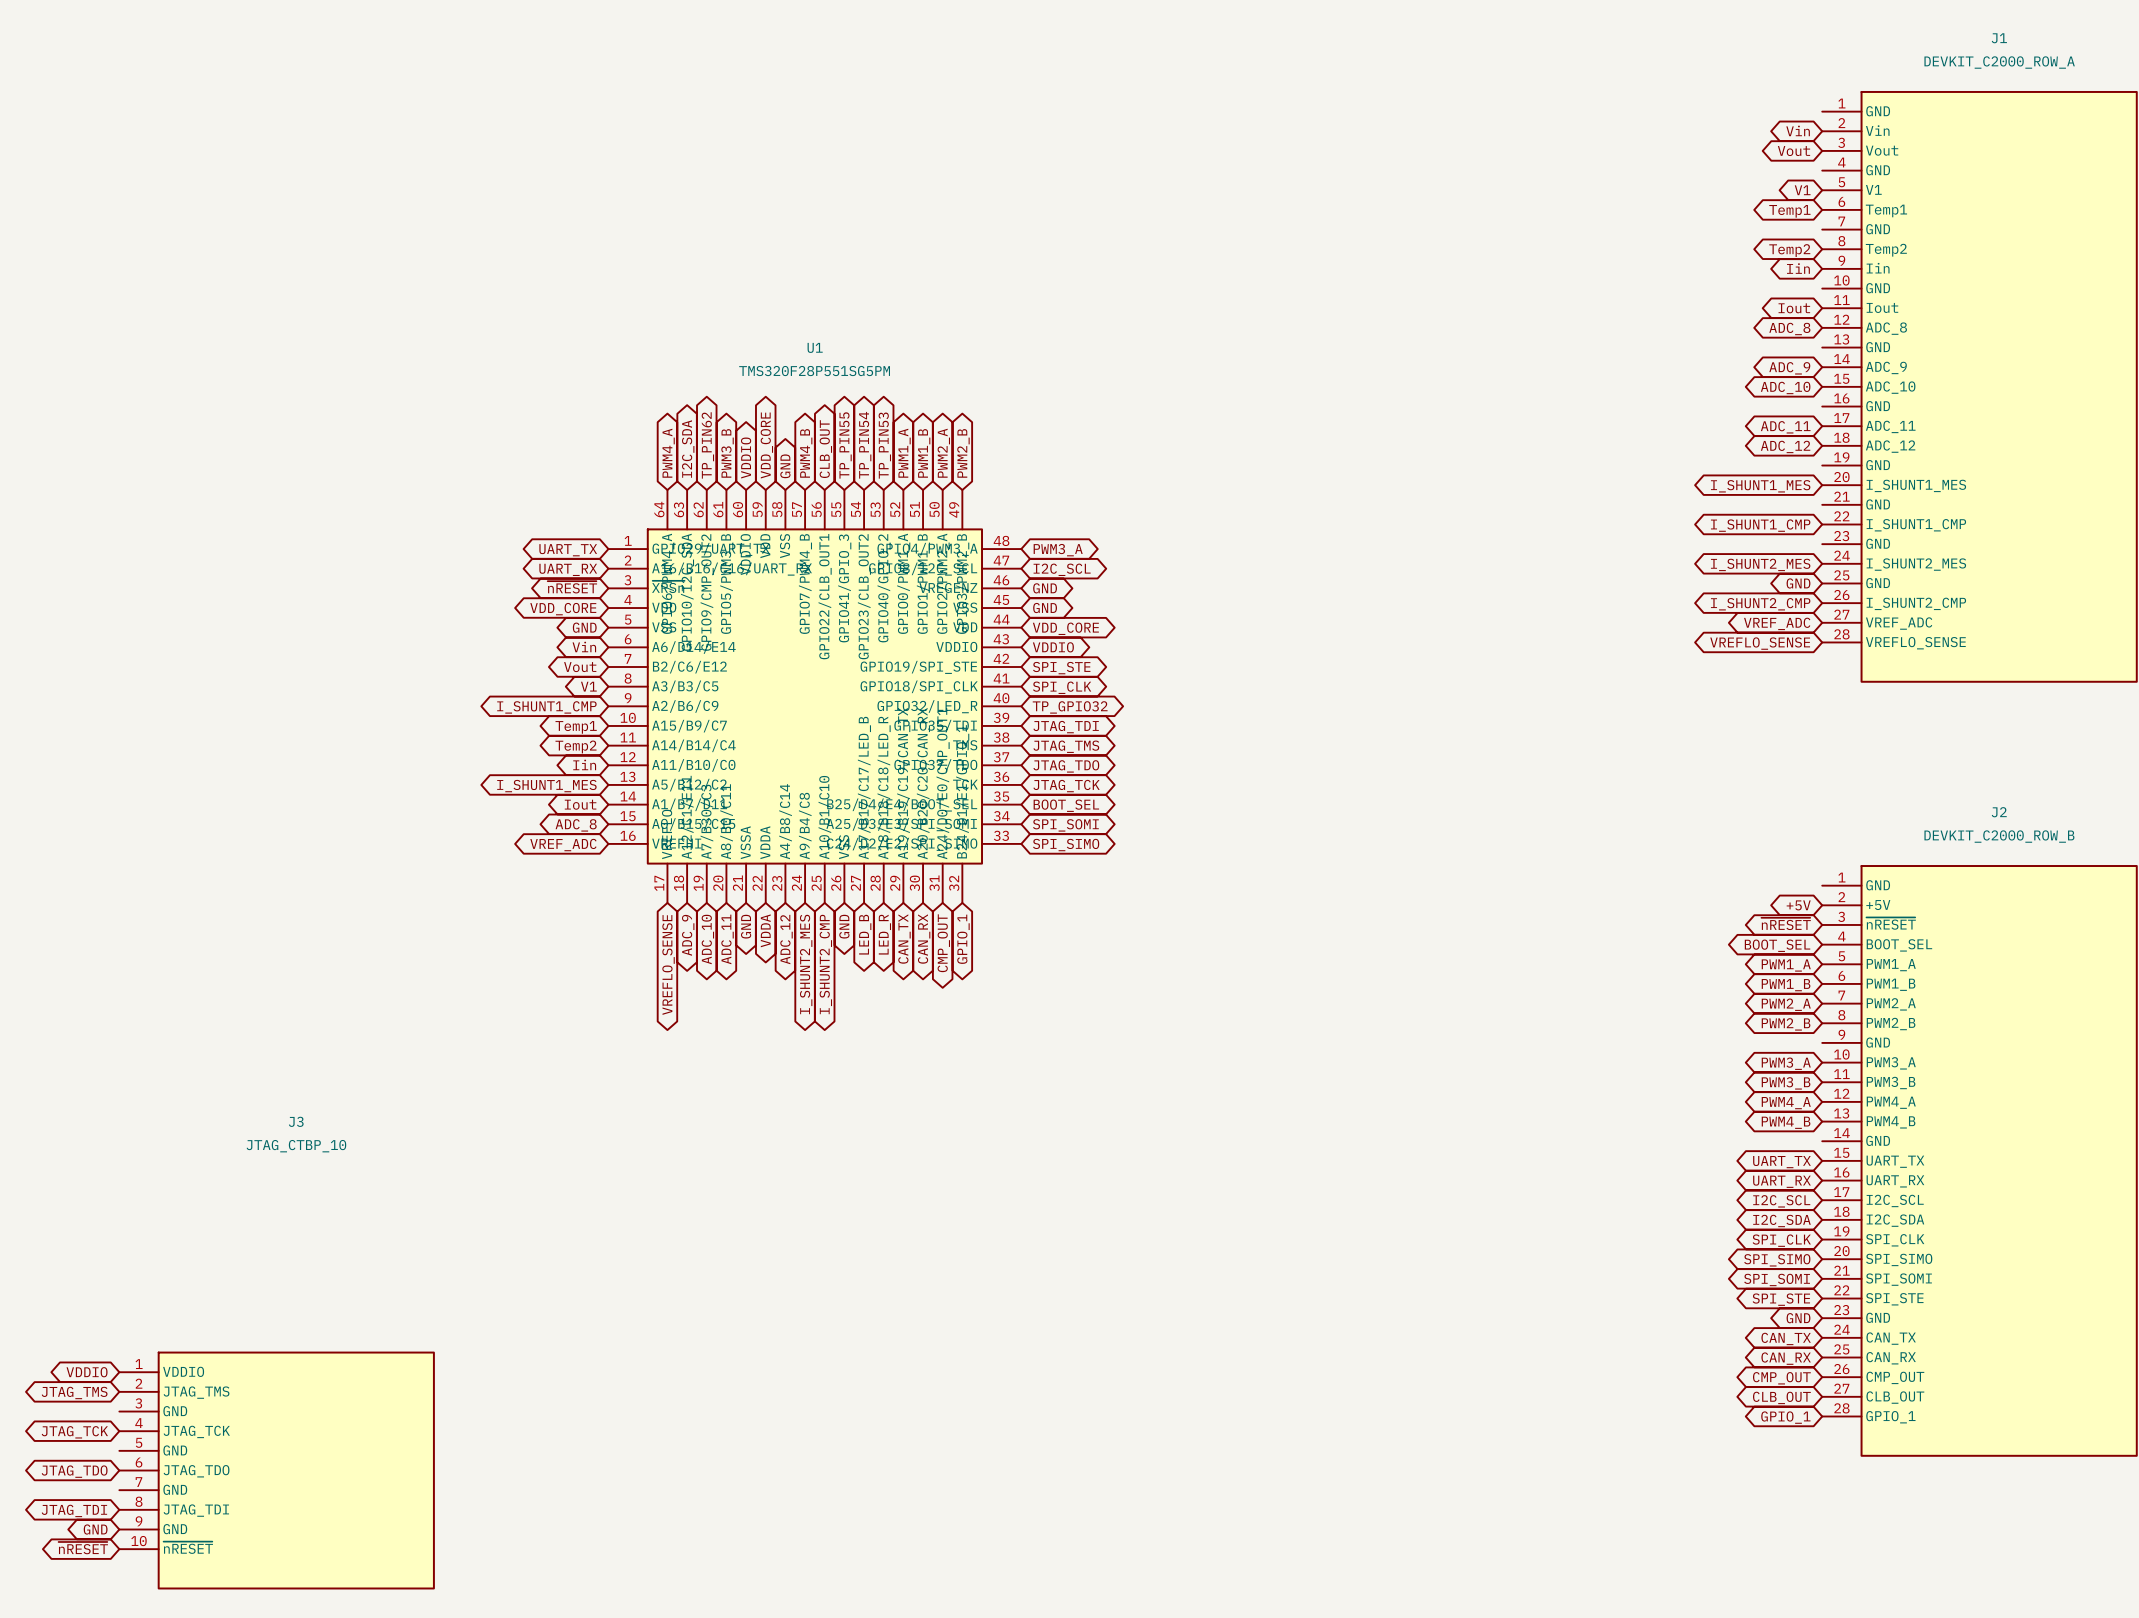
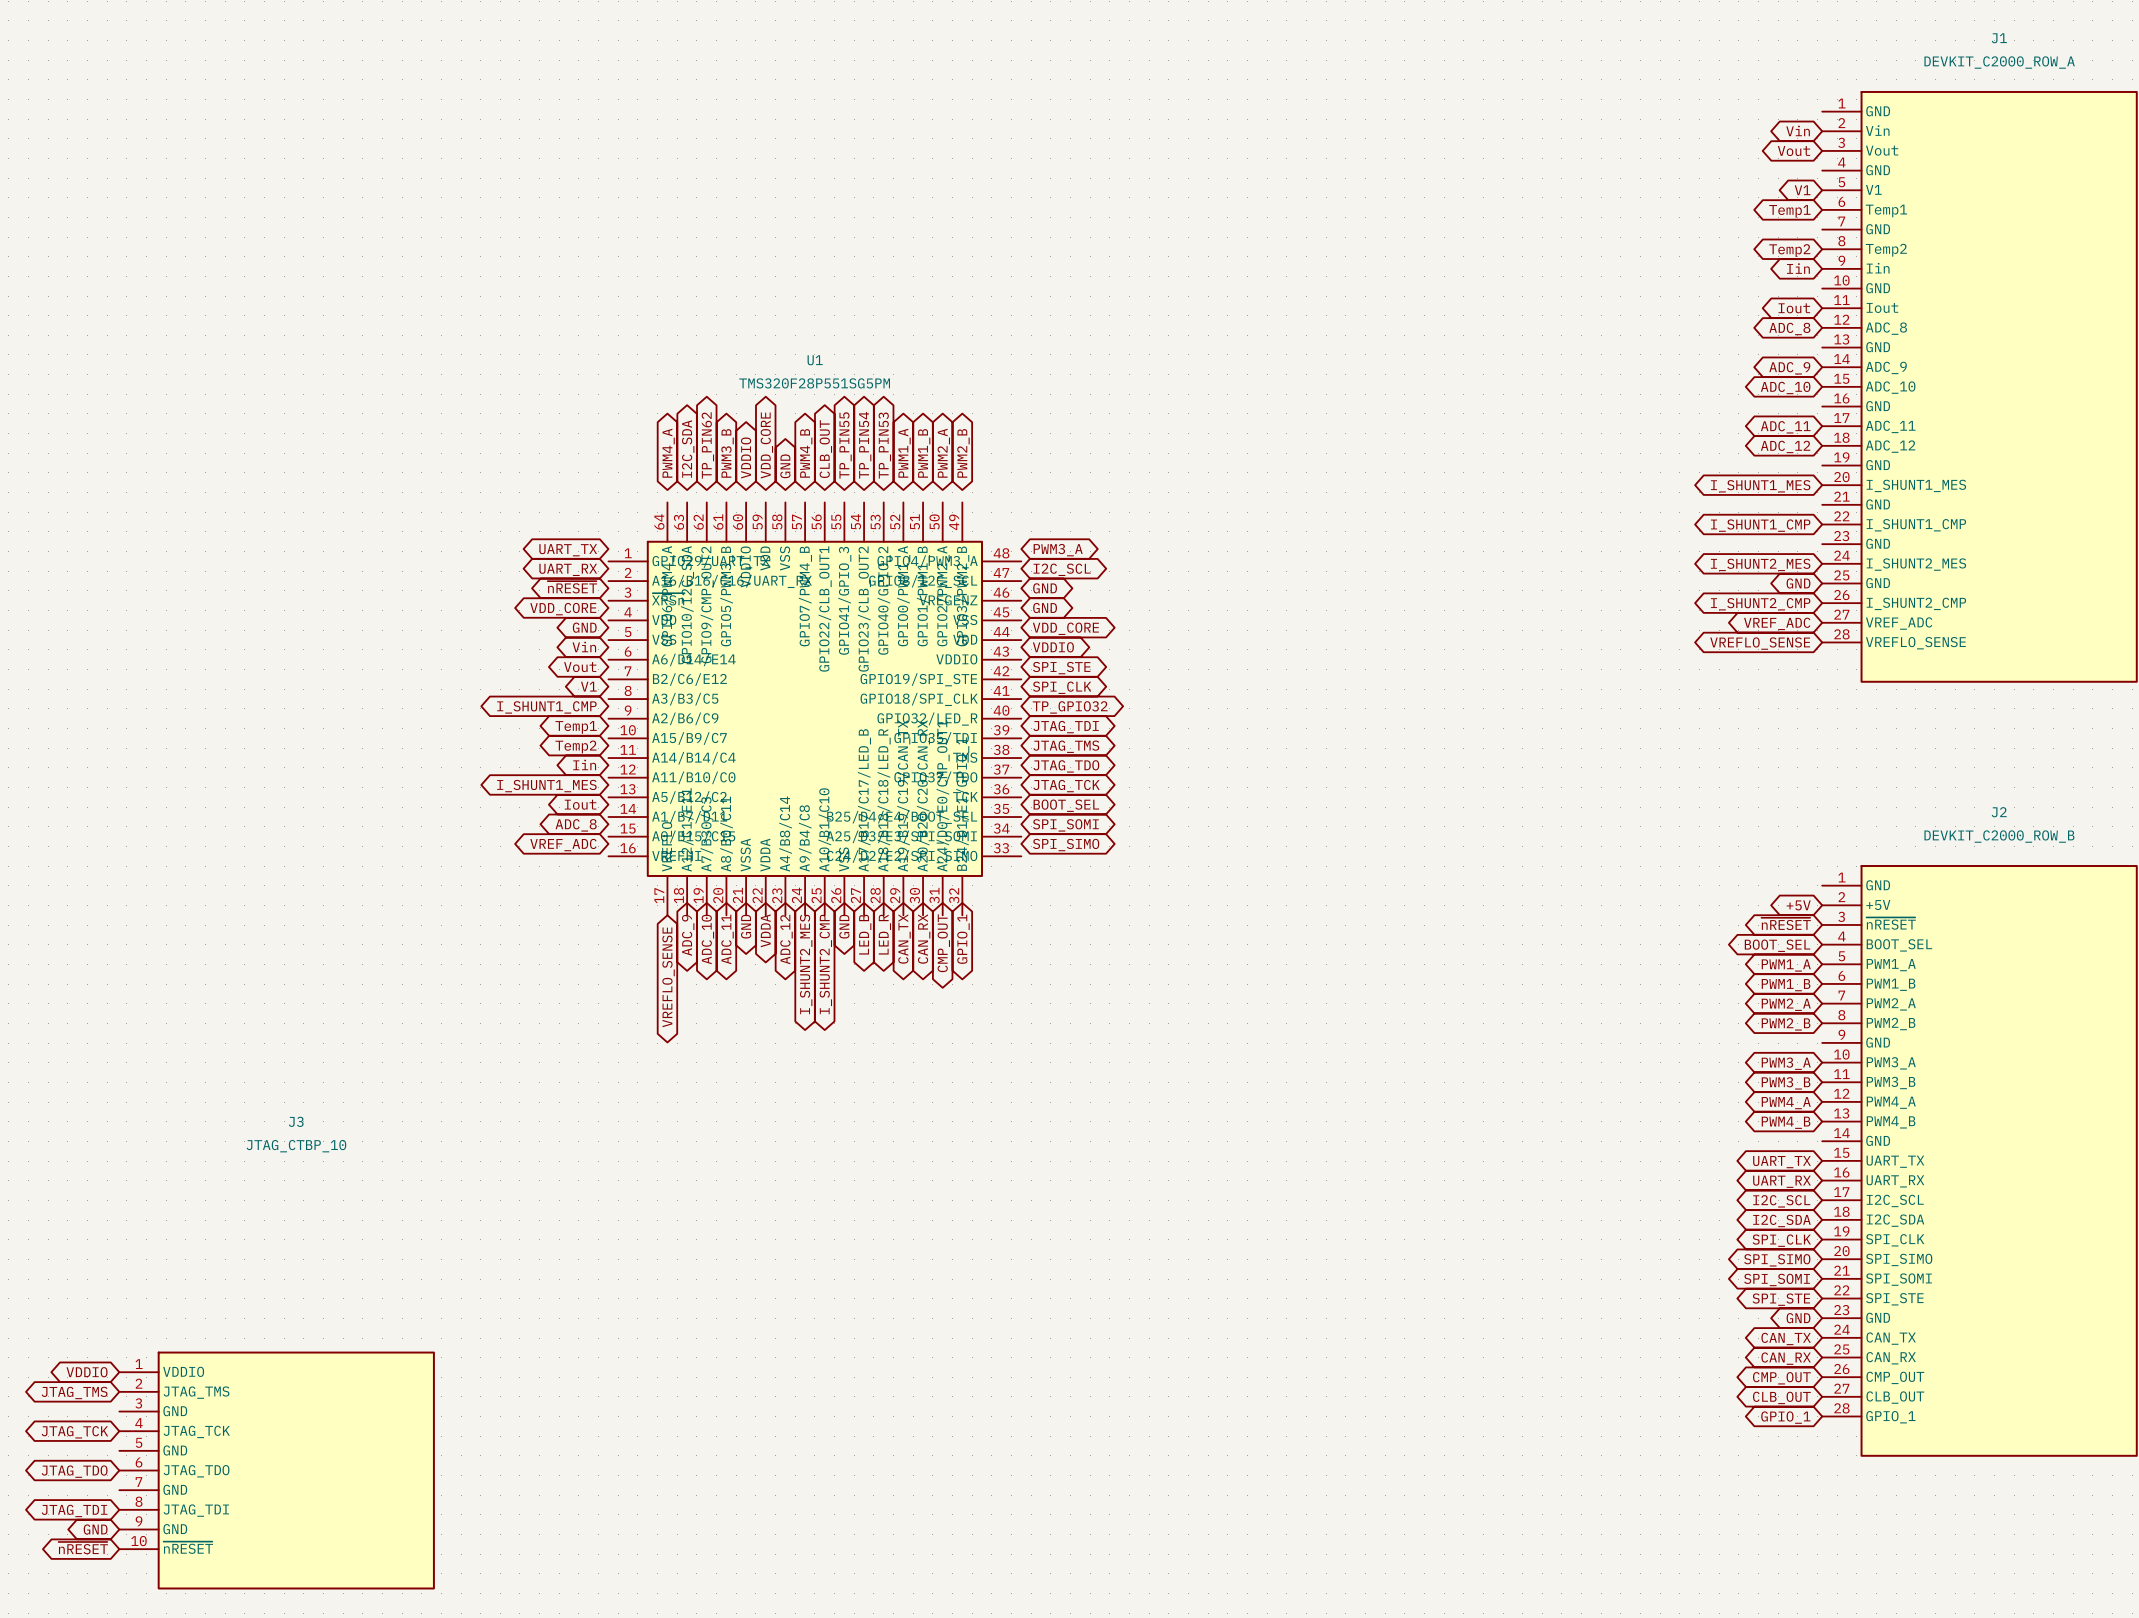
U1 position: (814, 696) -> (814, 708)
global label position: VREFLO_SENSE (668, 964) -> VREFLO_SENSE (668, 977)

